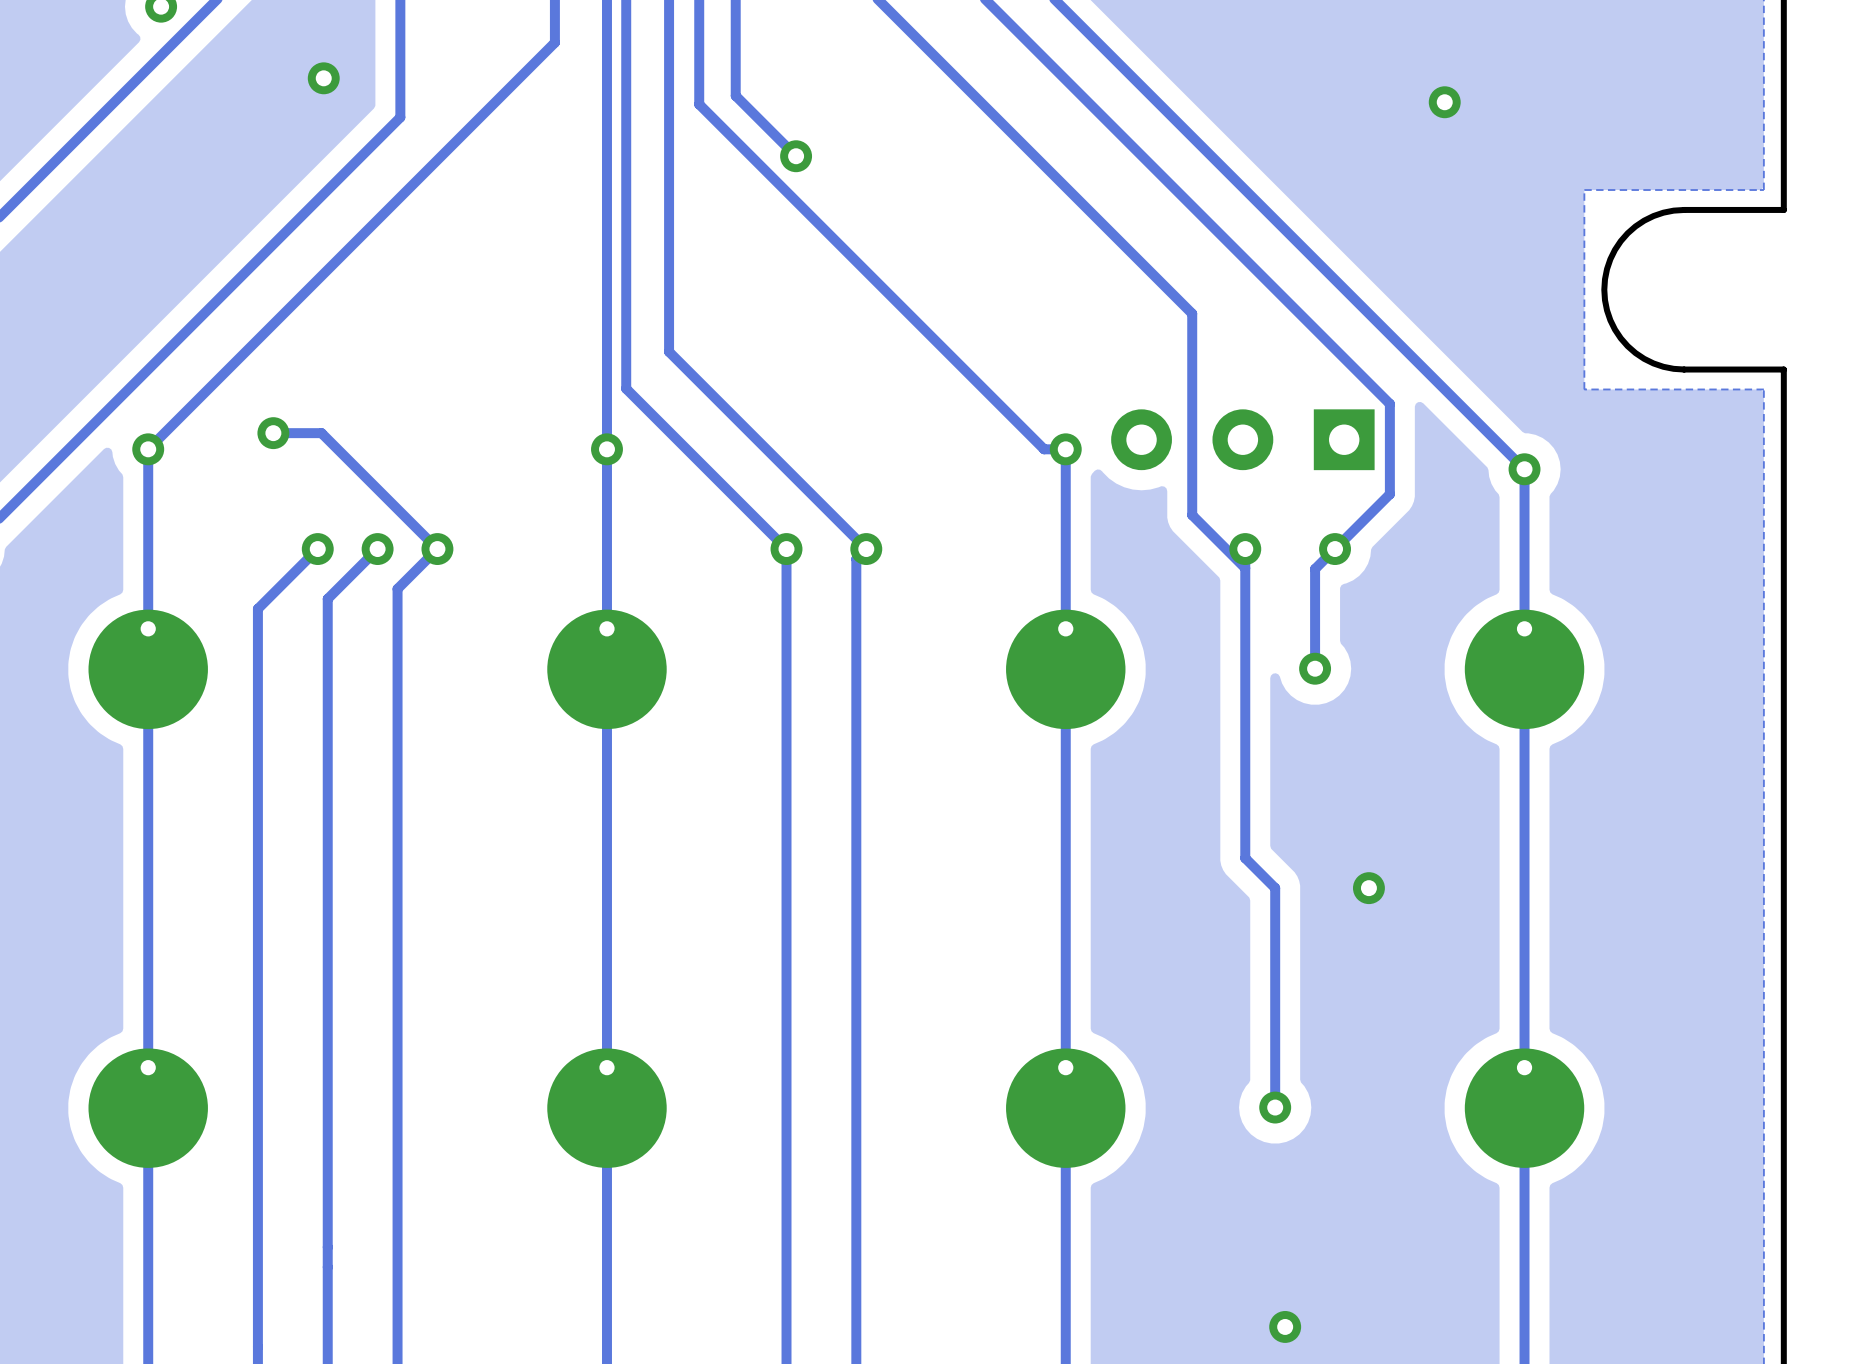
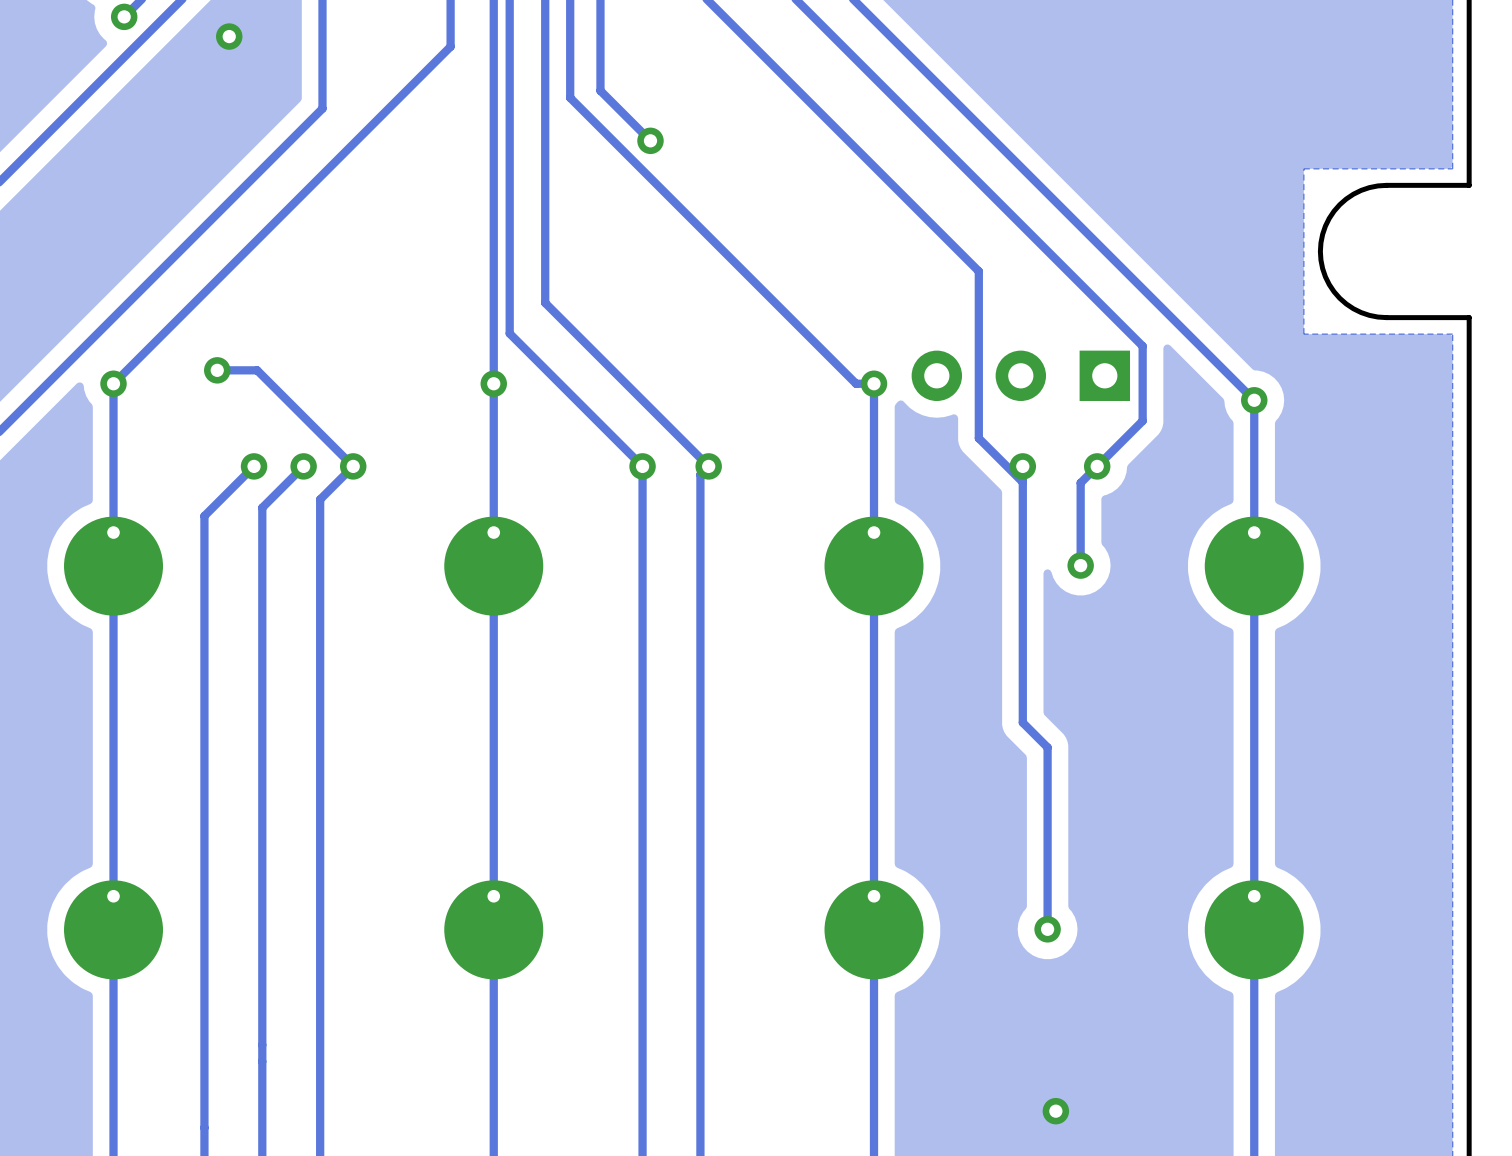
via position: (323, 78) -> (229, 36)
via: (1444, 102) -> none
via: (1368, 888) -> none

